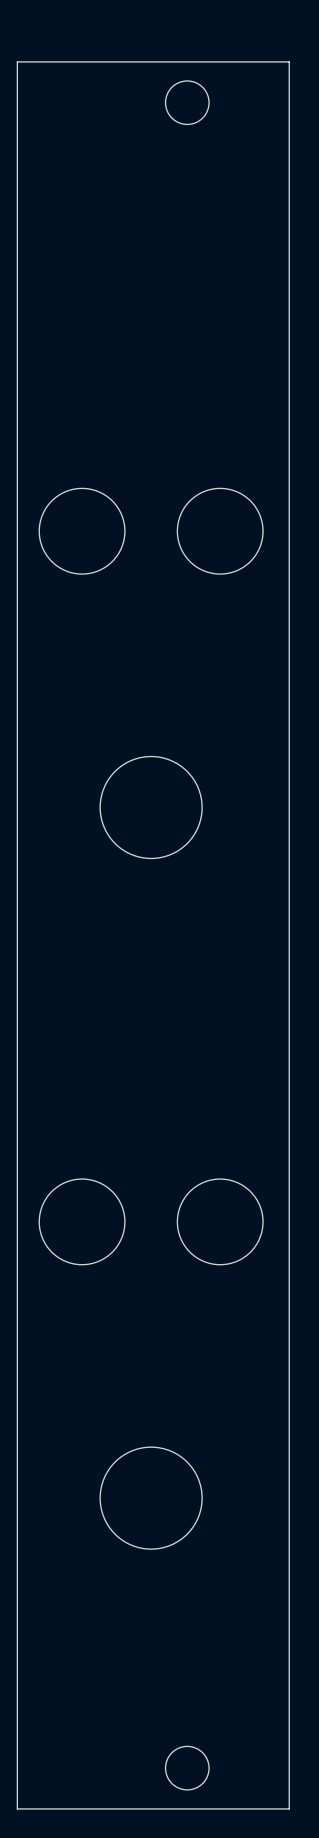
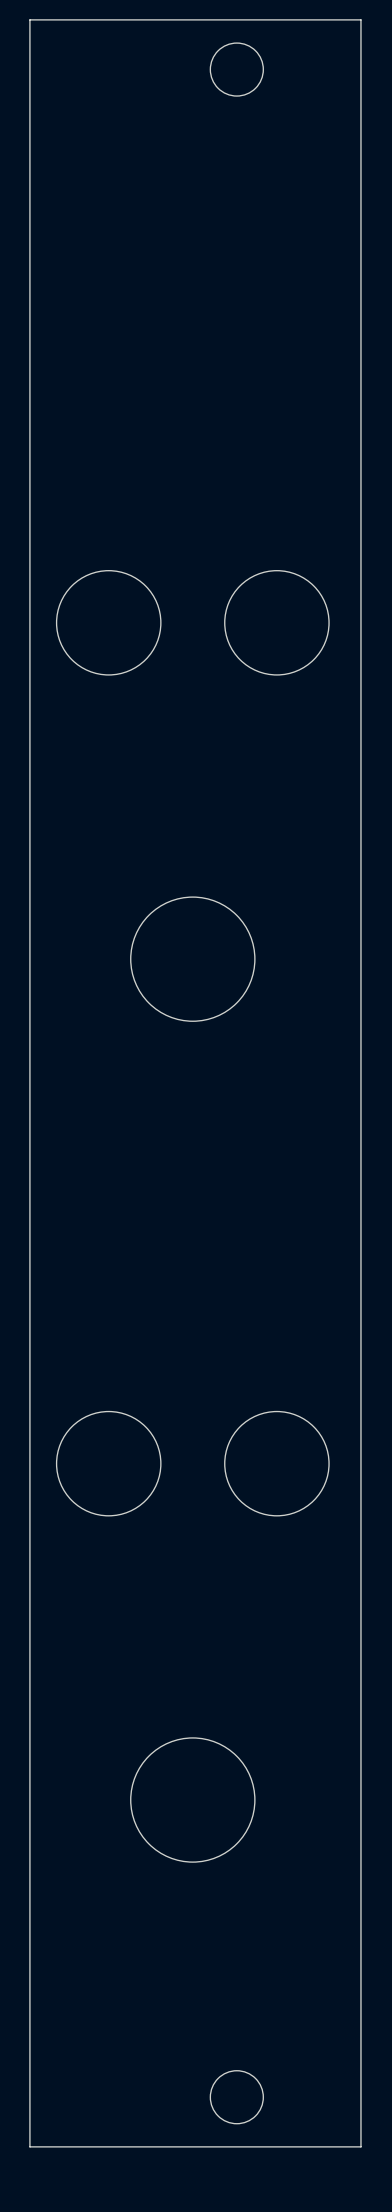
part position: (153, 935) -> (195, 1083)

